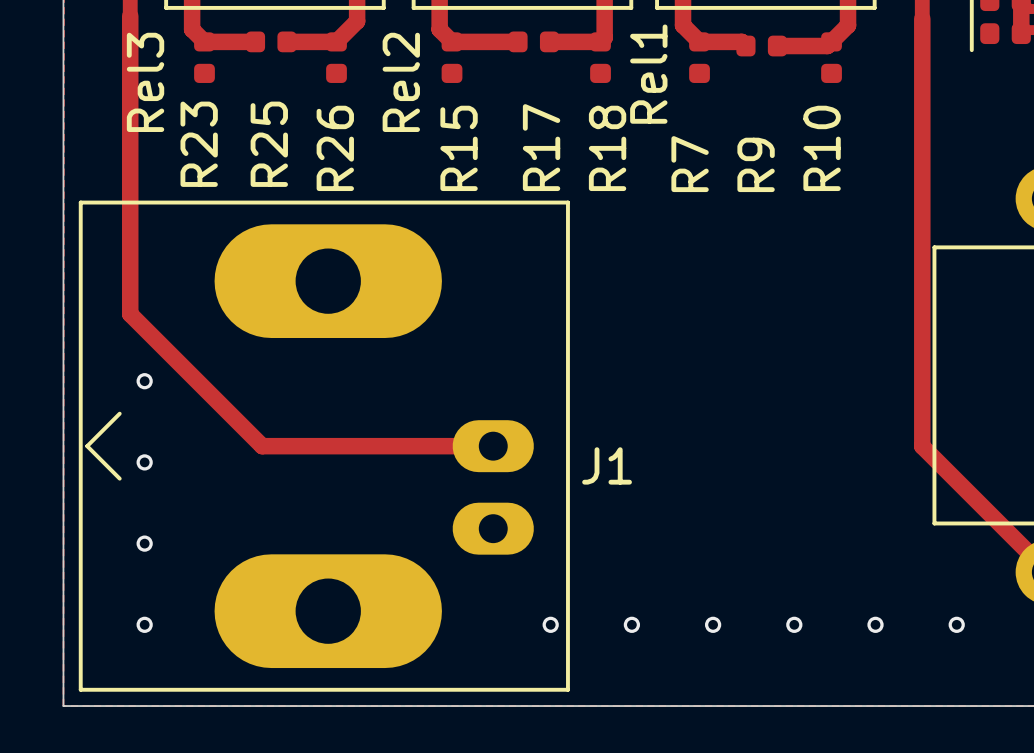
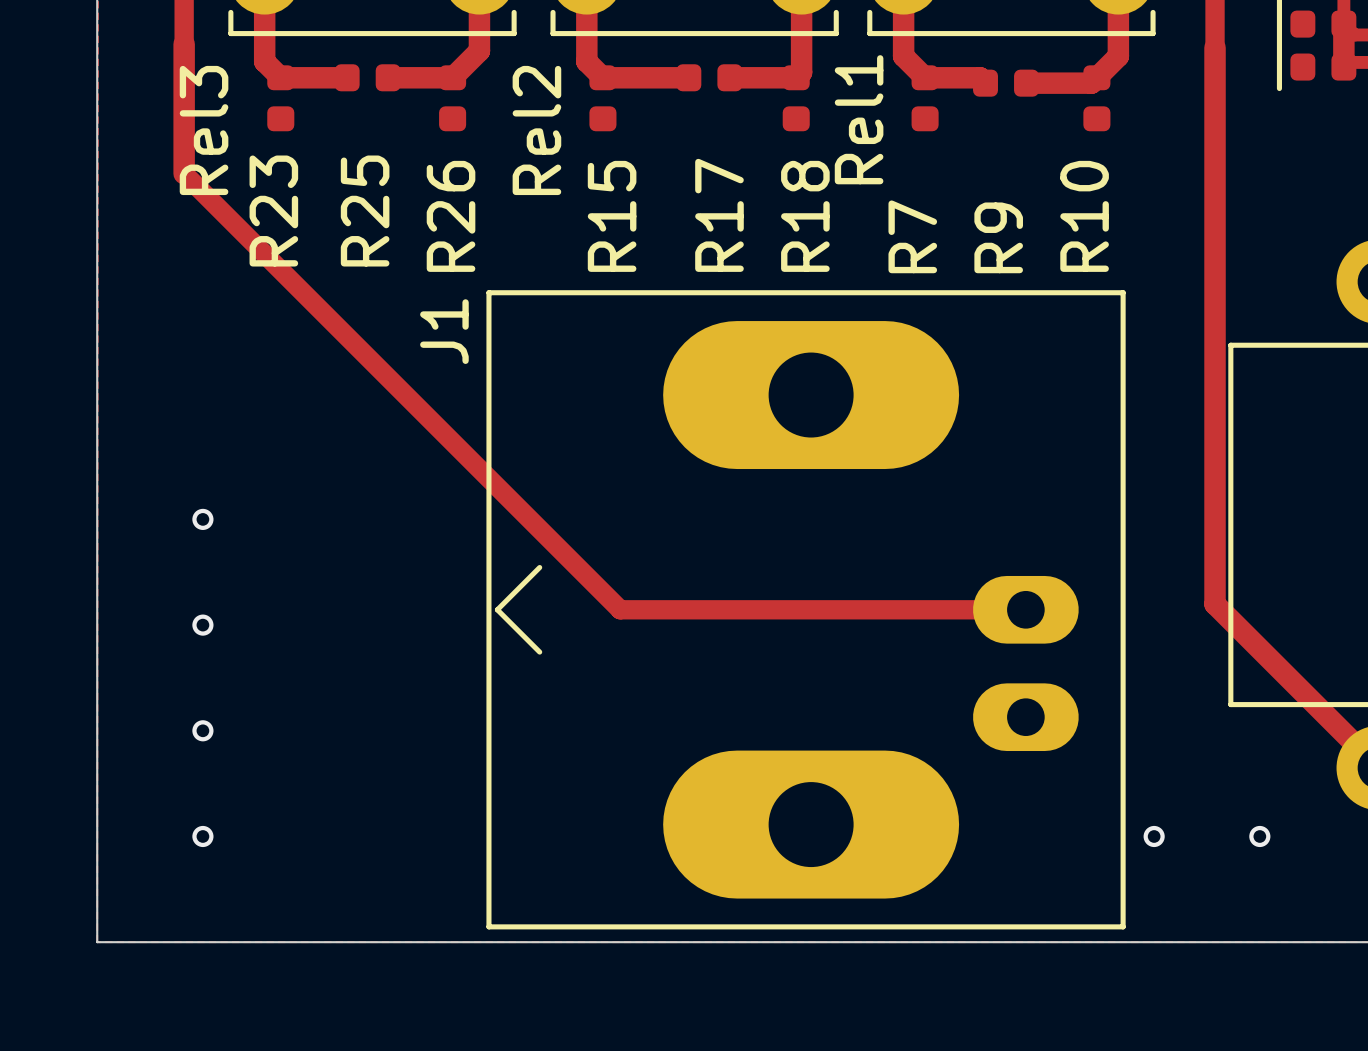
track: (130, 115) (130, 314) (262, 446) (493, 446) -> (184, 173) (620, 609) (1025, 609)
J1 position: (324, 446) -> (806, 609)
J1 name rotation: 0° (607, 465) -> 90° counterclockwise (444, 331)
J1 name position: J1 (607, 465) -> J1 (444, 331)
via: (550, 624) -> none
via: (631, 624) -> none
via: (713, 624) -> none
via: (794, 624) -> none

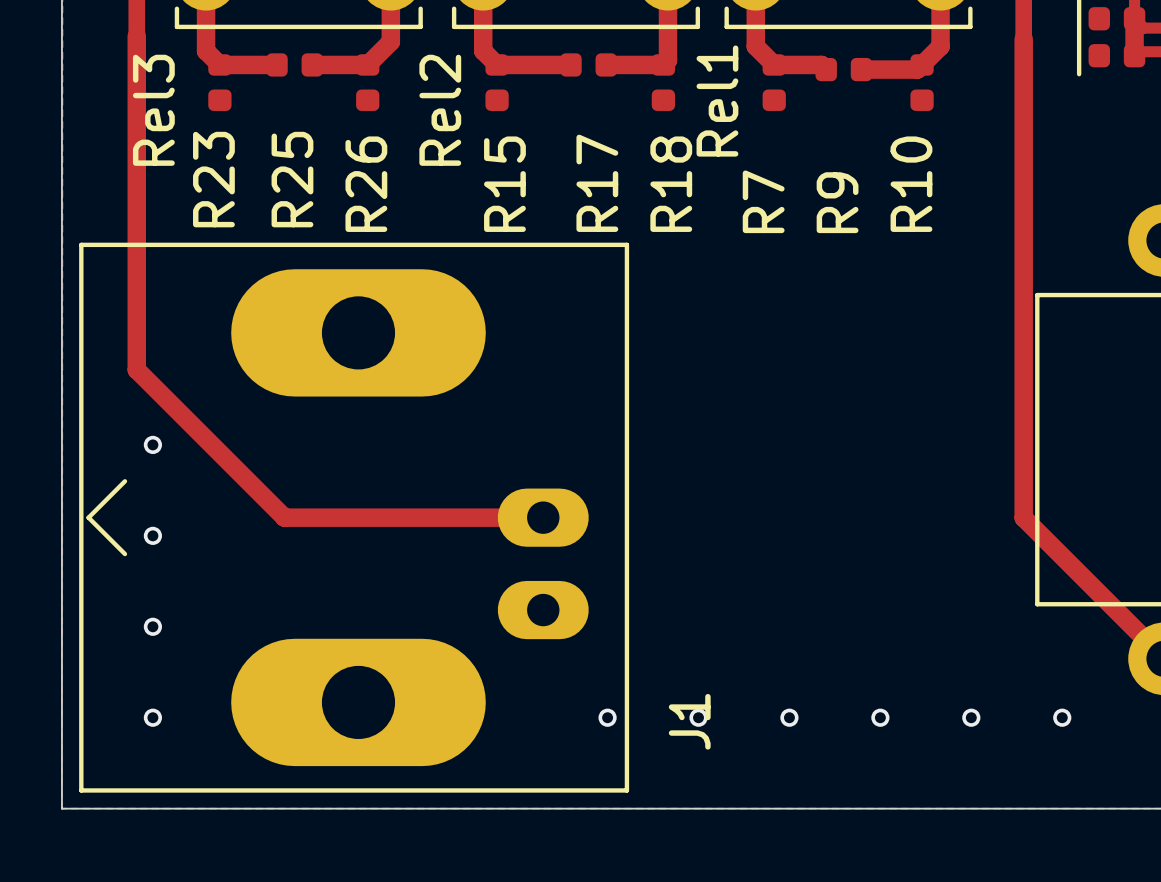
track: (184, 173) (620, 609) (1025, 609) -> (136, 147) (136, 369) (284, 517) (543, 517)
J1 name position: J1 (444, 331) -> J1 (689, 721)
J1 position: (806, 609) -> (354, 517)
via: none -> (607, 717)
via: none -> (698, 717)
via: none -> (789, 717)
via: none -> (880, 717)

